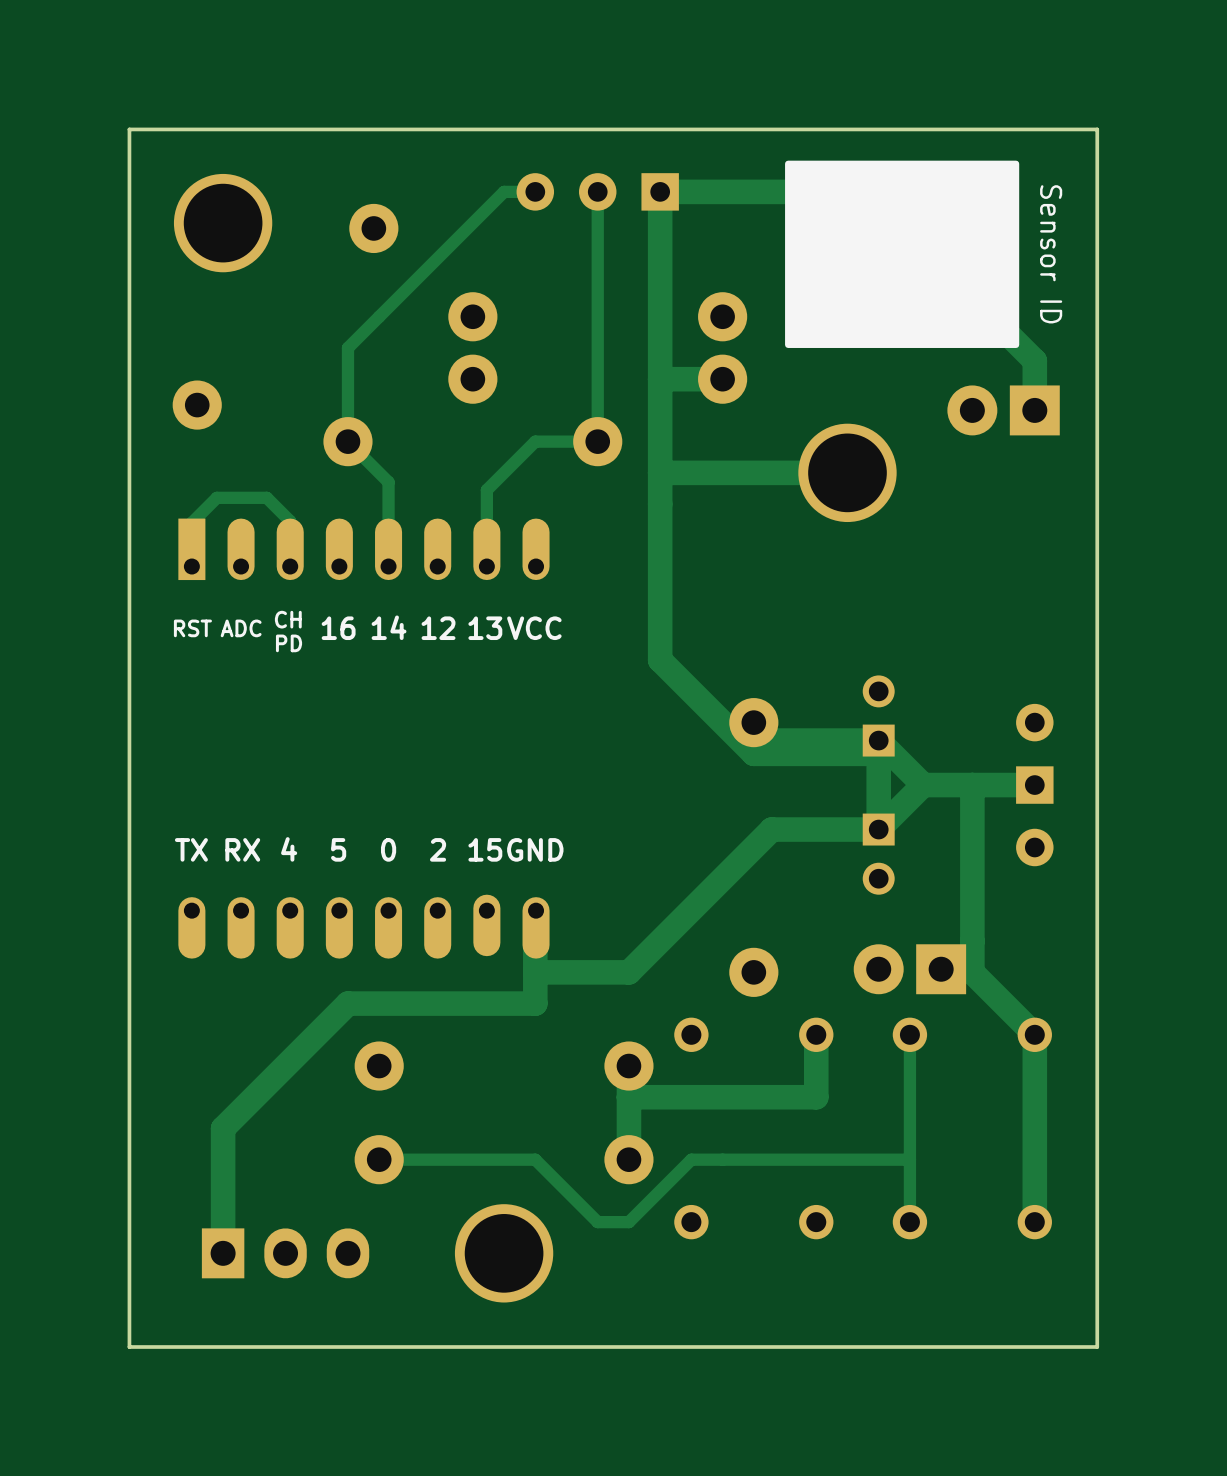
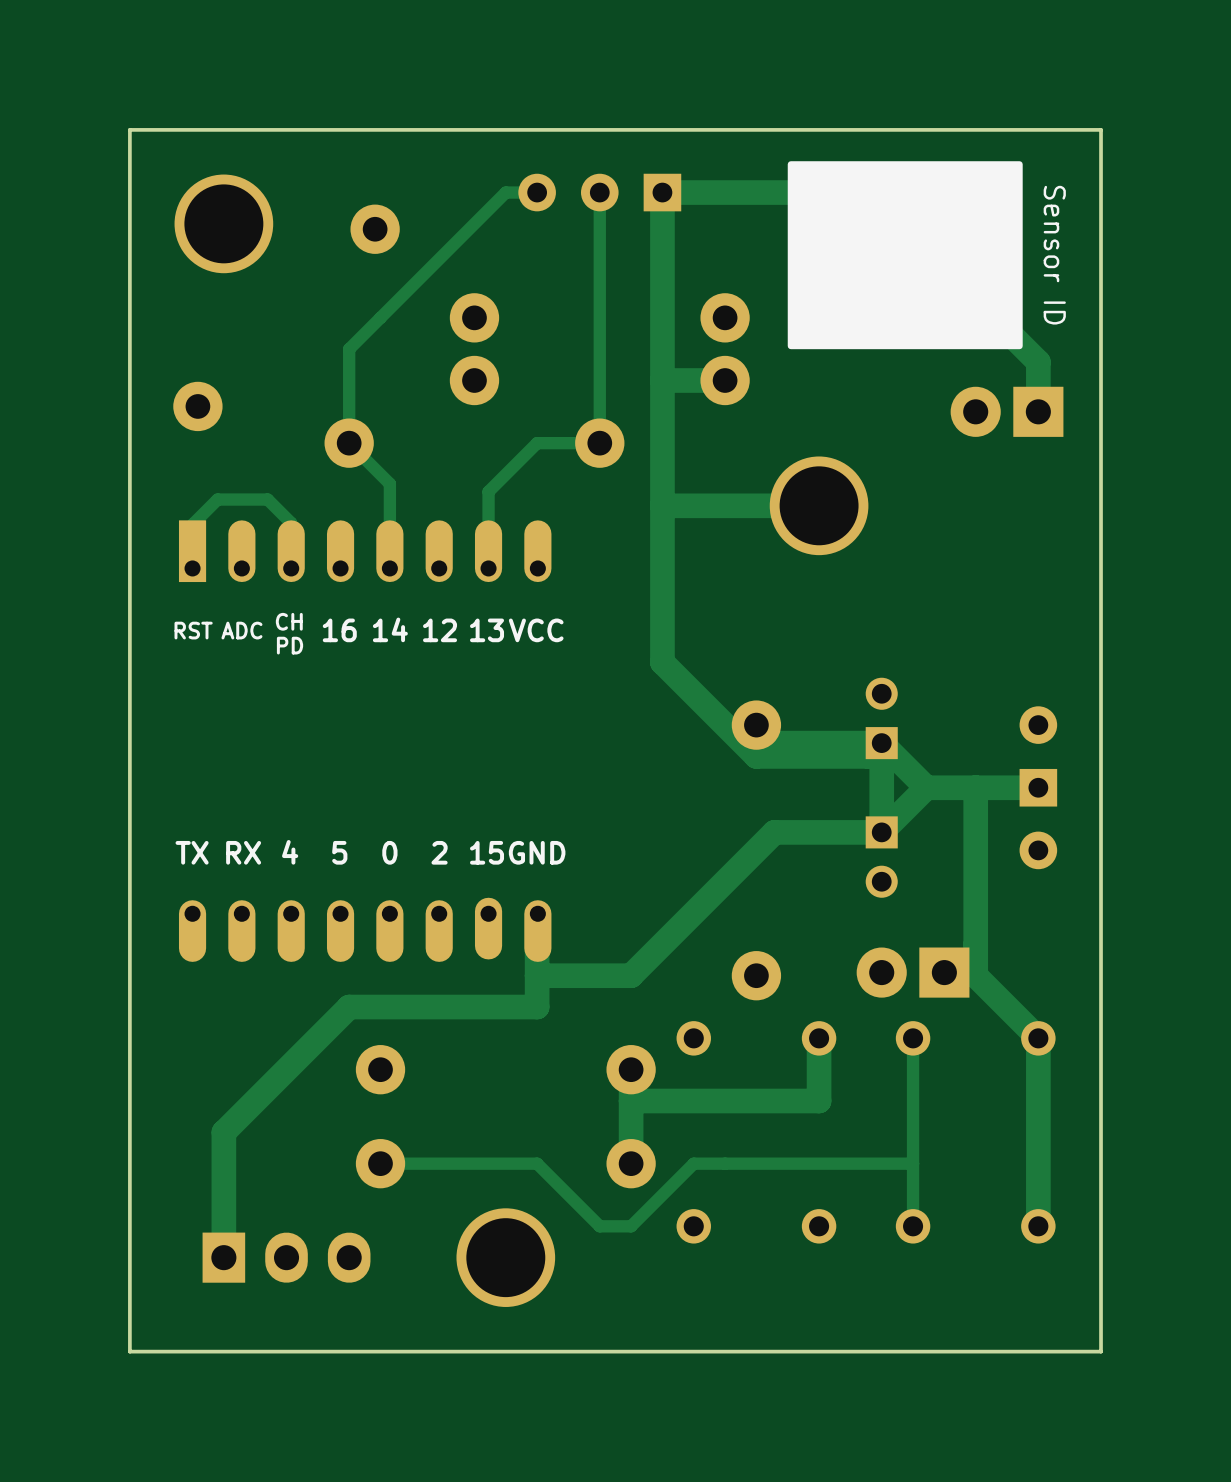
track: (847, 472) (660, 472) -> none
part position: (847, 472) -> (819, 505)
track: none -> (819, 505) (662, 505)

